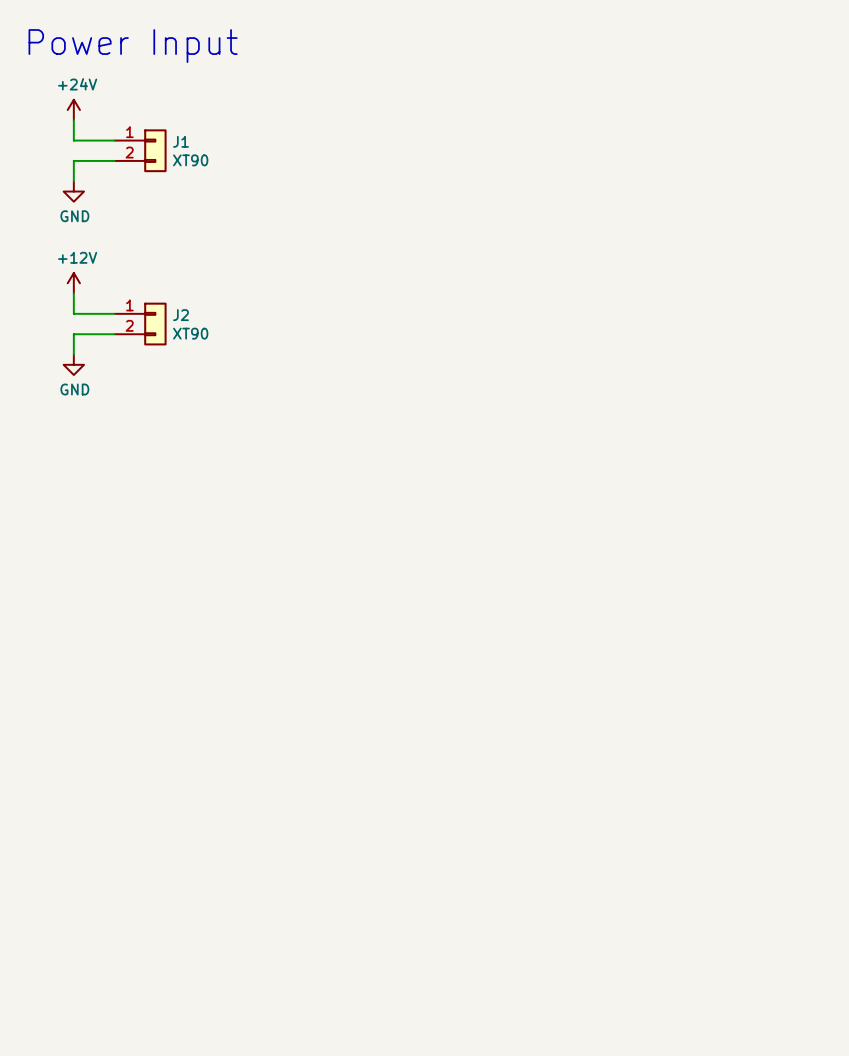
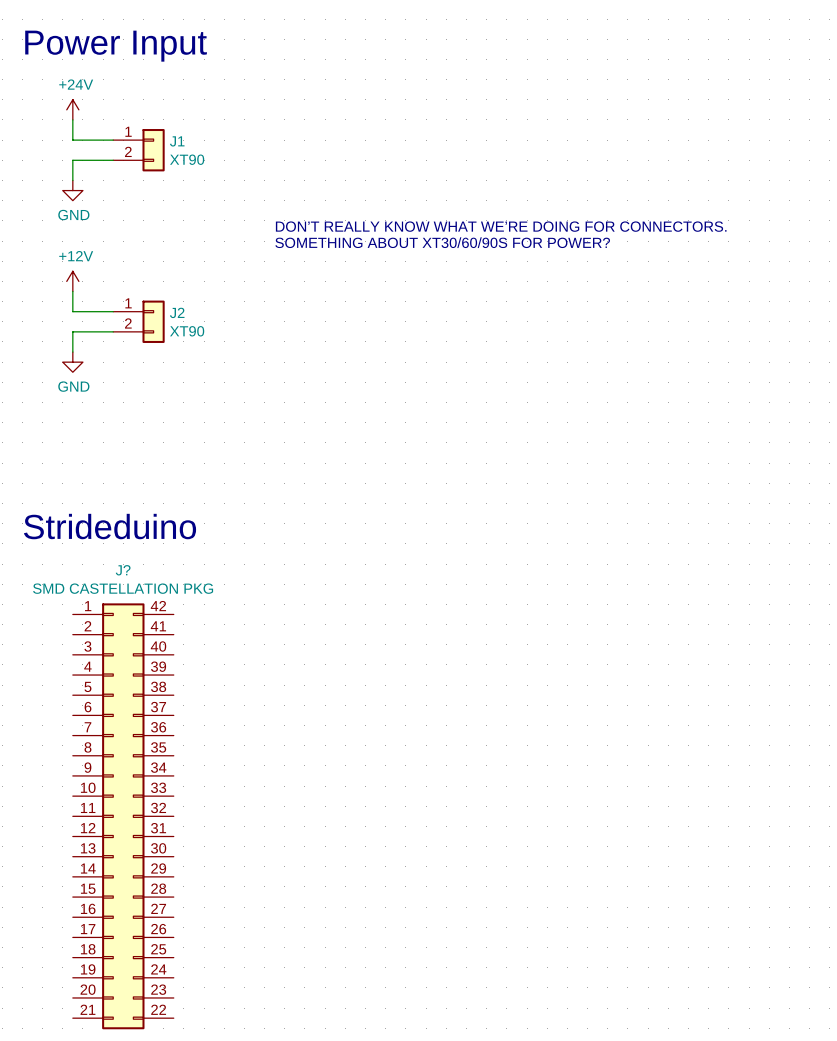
text: none -> DON’T REALLY KNOW WHAT WE’RE DOING FOR CONNECTORS. (501, 226)
text: none -> SOMETHING ABOUT XT30/60/90S FOR POWER? (442, 242)
text: none -> Strideduino (110, 526)
J?: none -> SMD CASTELLATION PKG (123, 816)

